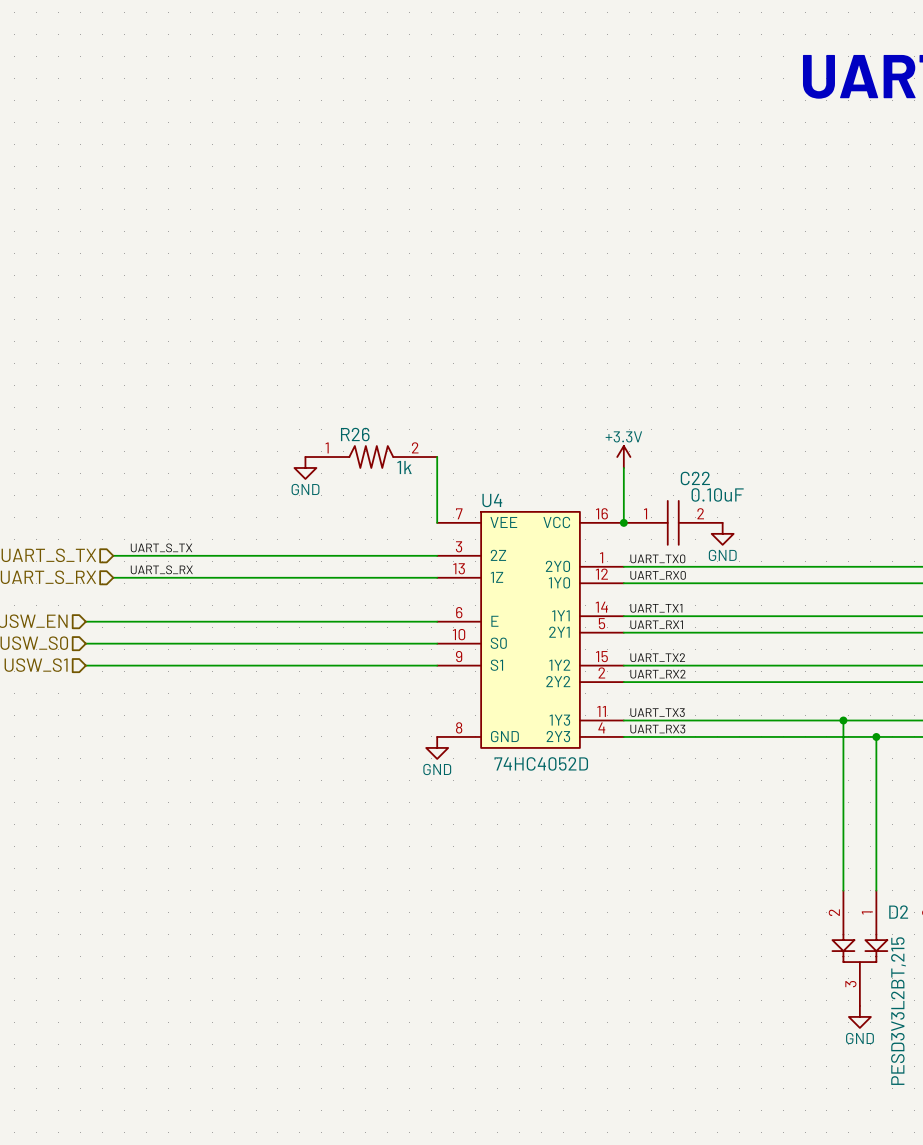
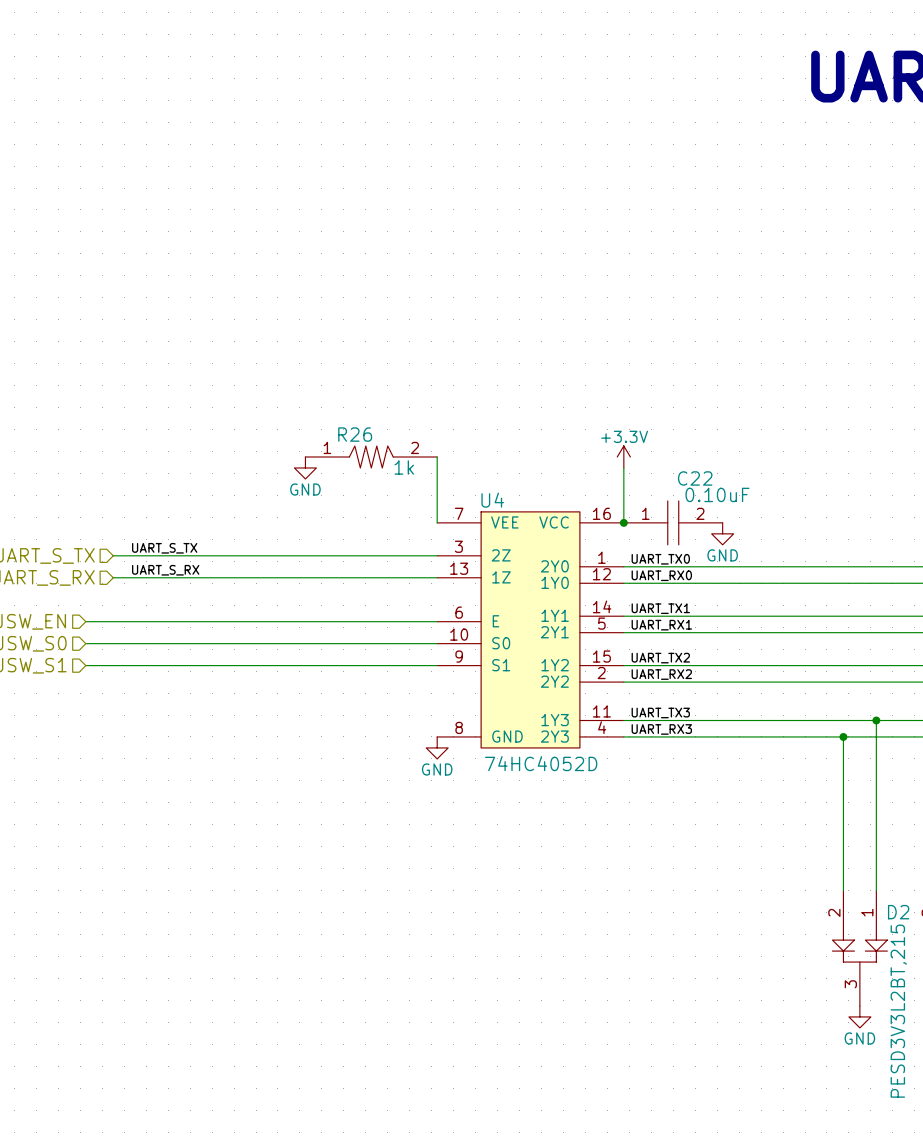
wire: (843, 720) (843, 736) -> (876, 720) (876, 736)
junction: (843, 720) -> none
junction: none -> (876, 720)
junction: none -> (843, 736)
junction: (876, 736) -> none

